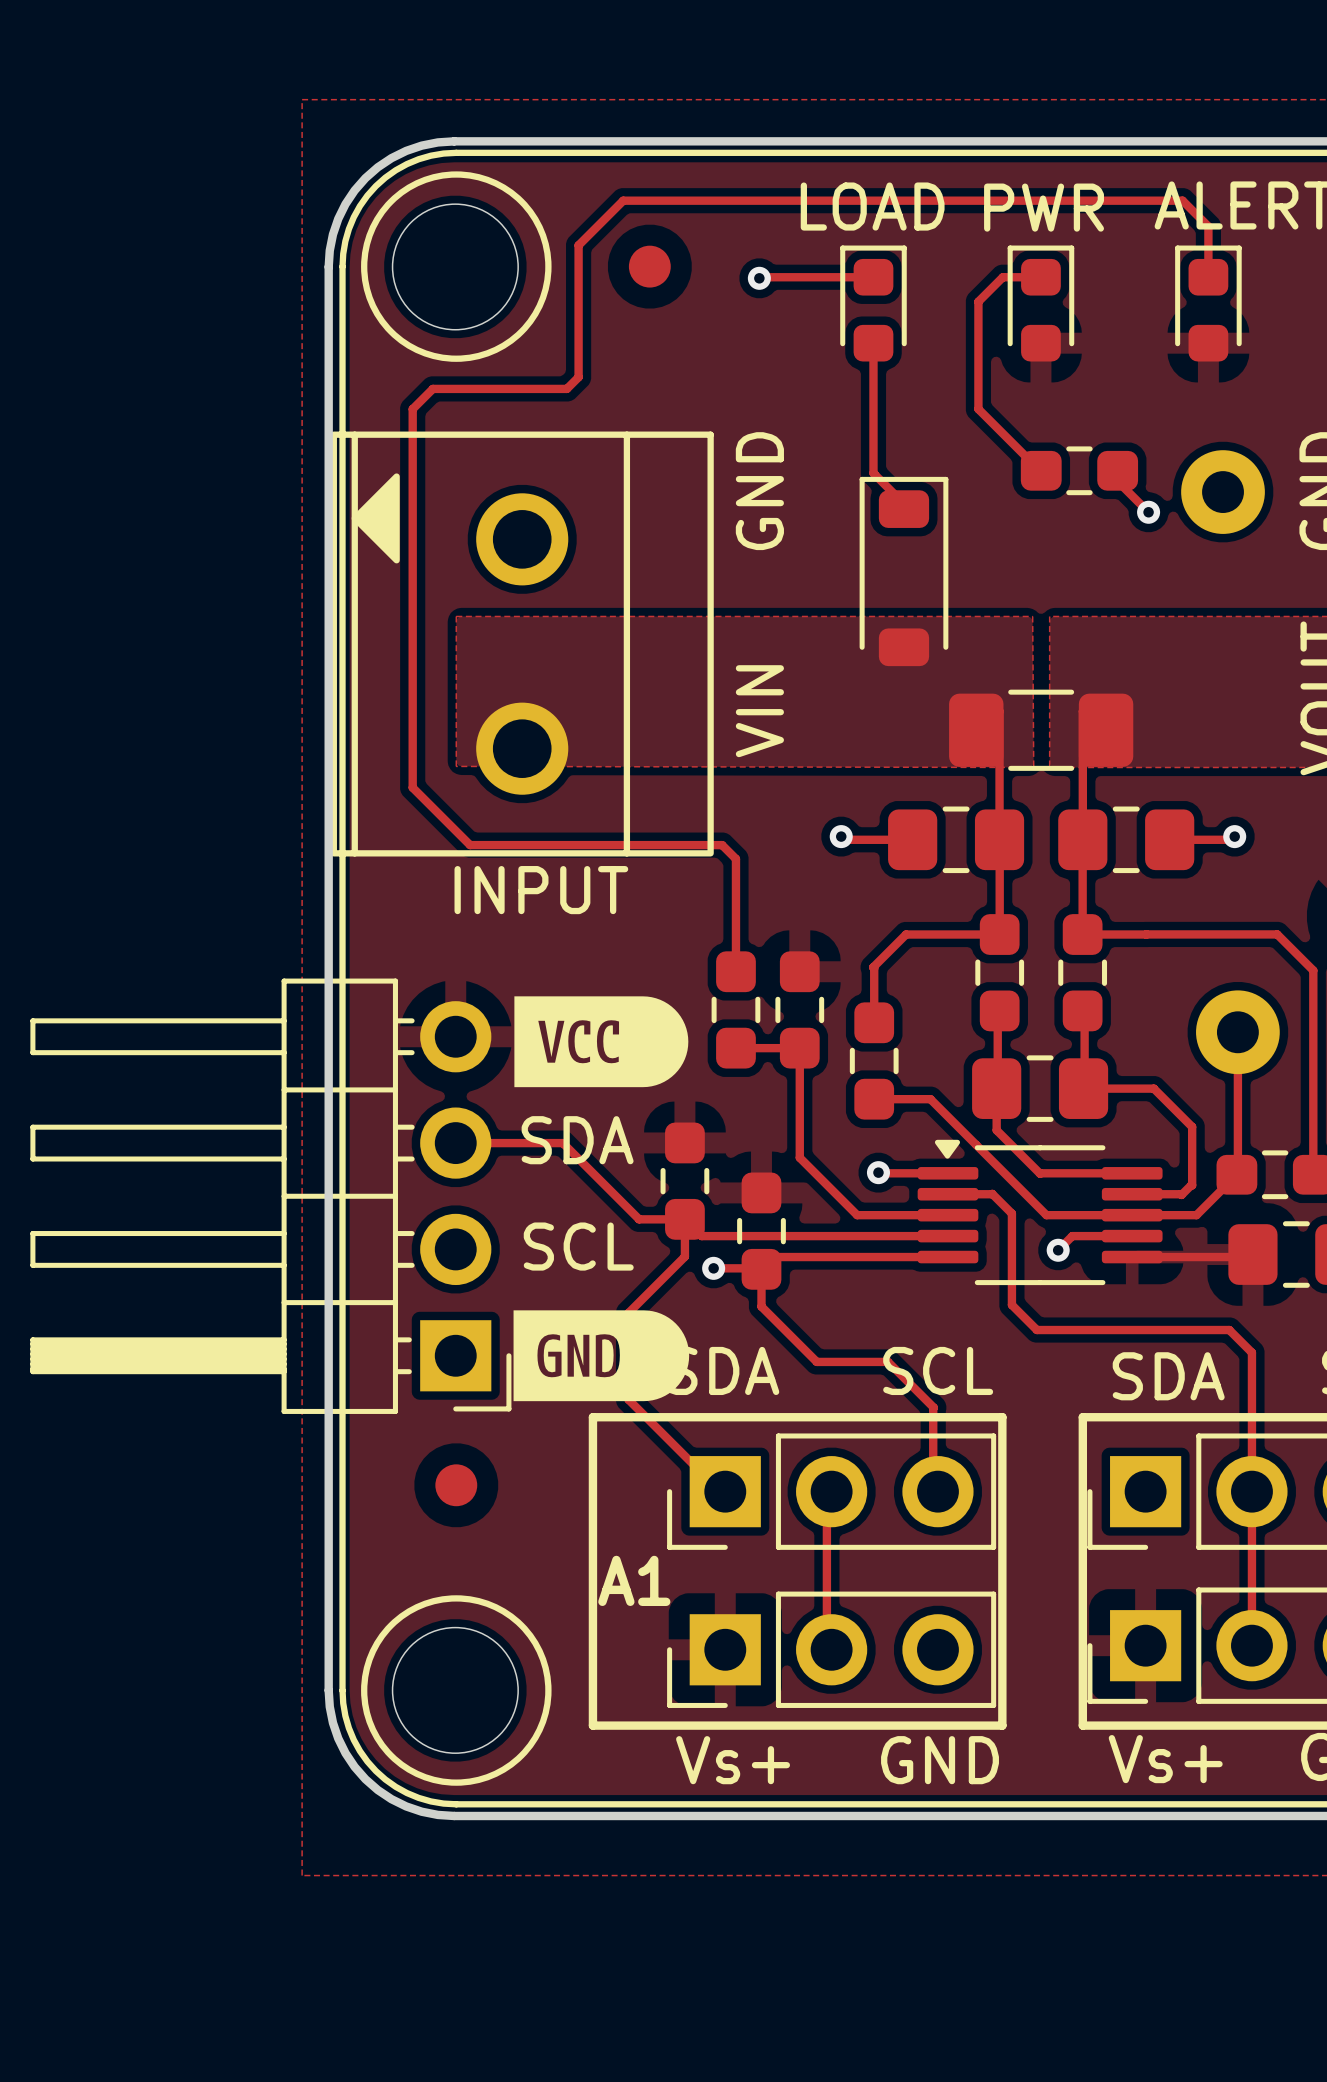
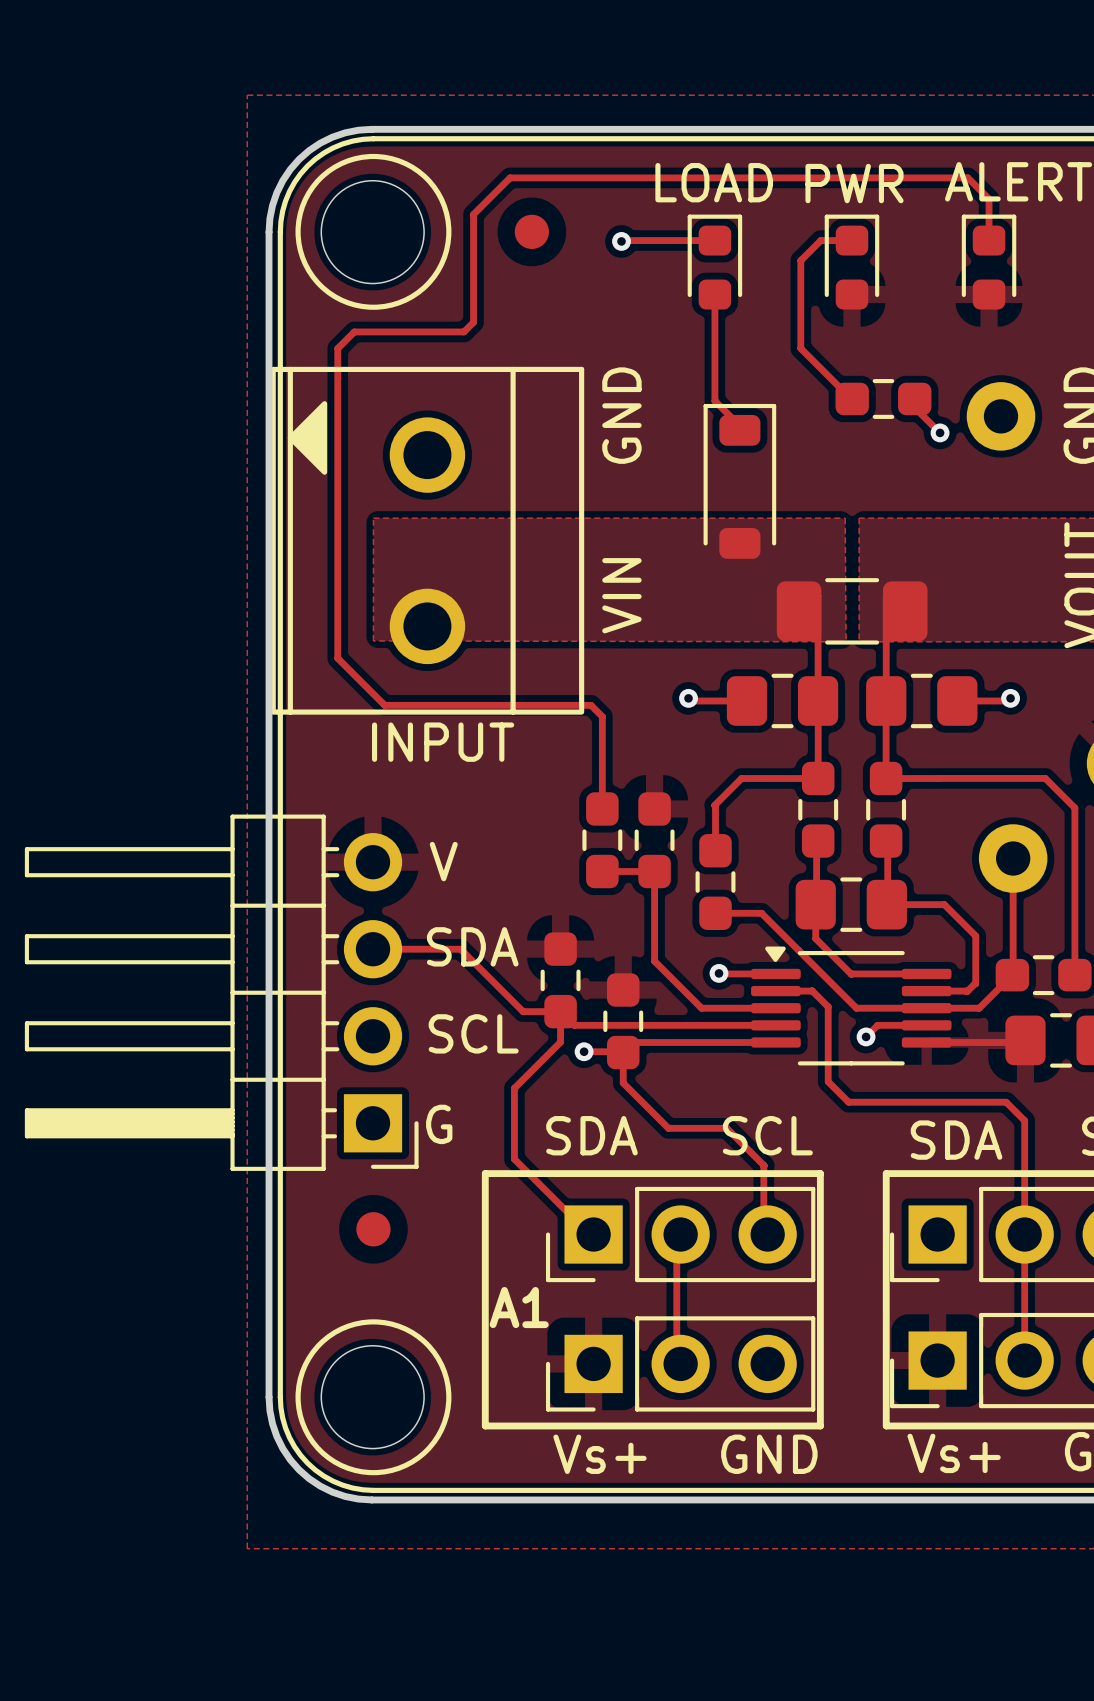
drawing: [514, 996, 689, 1088] -> none
text: none -> V (443, 861)
drawing: [513, 1310, 690, 1402] -> none
text: none -> G (439, 1124)

